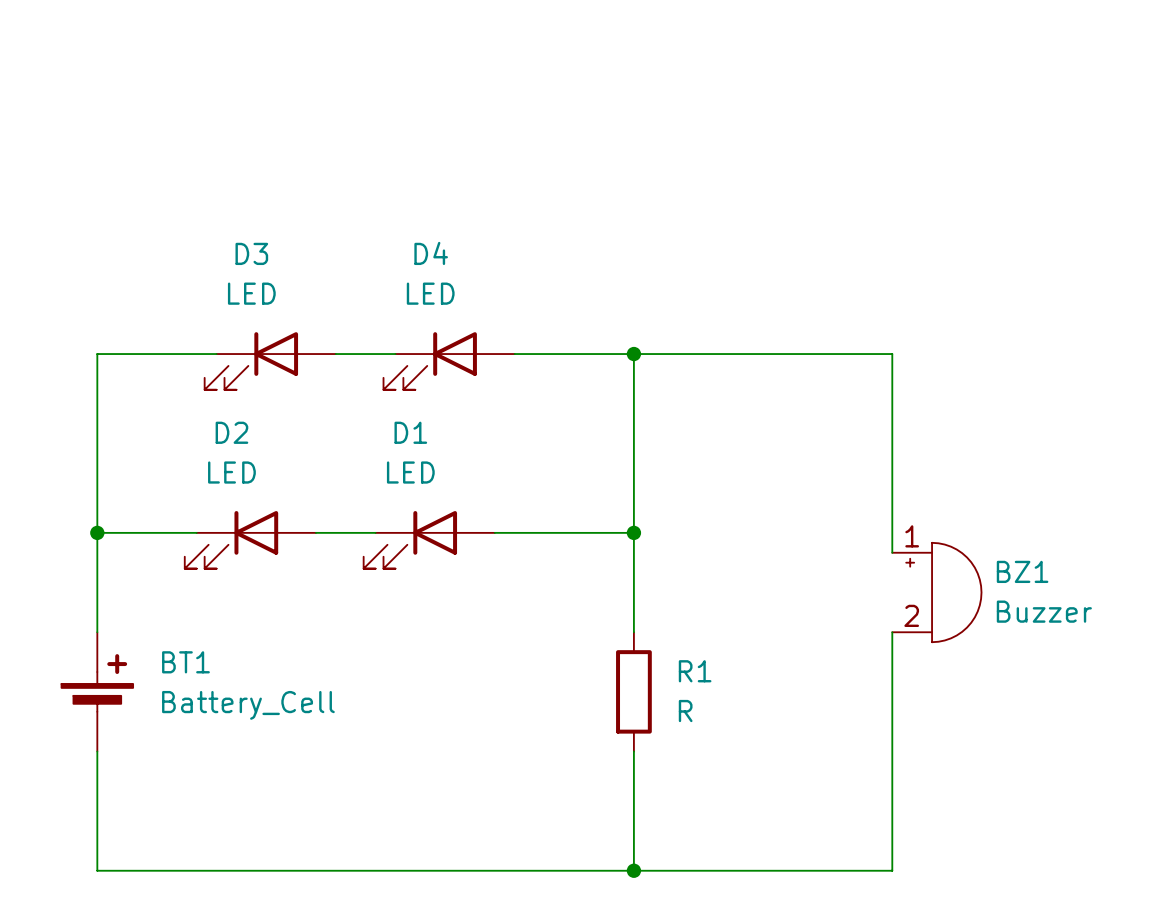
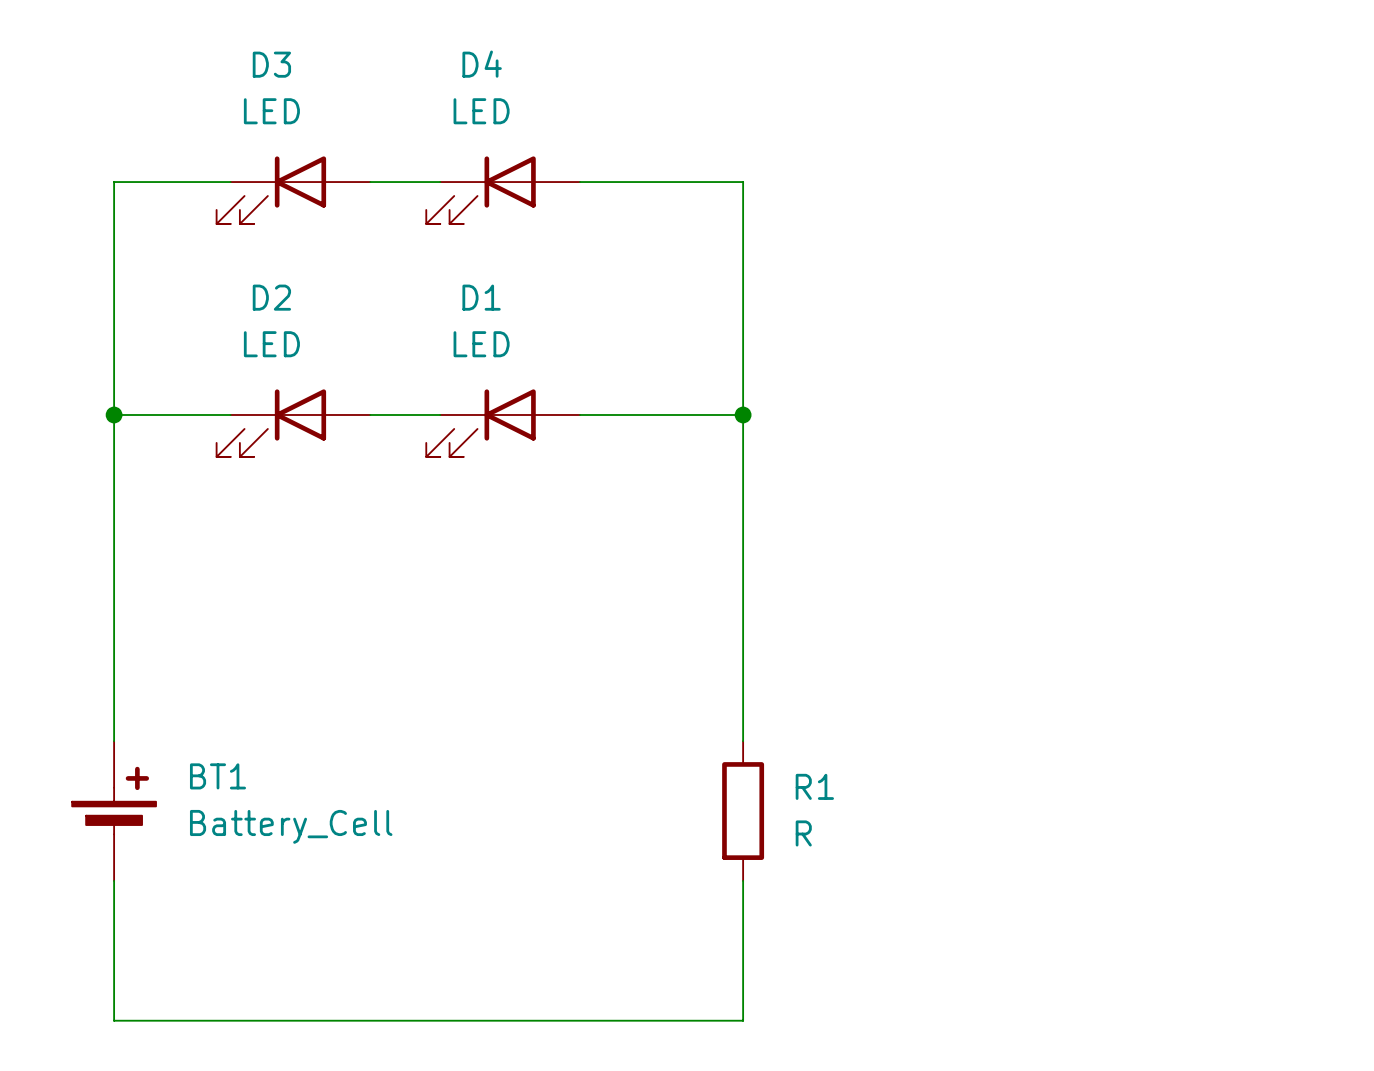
wire: none -> (230, 182) (114, 182) (114, 414)
junction: none -> (114, 414)
wire: (633, 354) (892, 354) (892, 552) -> (743, 414) (743, 182) (580, 182)
D3 position: (270, 360) -> (293, 190)
D4 position: (449, 360) -> (503, 190)
wire: (97, 532) (196, 532) -> none
junction: (97, 532) -> none
wire: (315, 532) (375, 532) -> (370, 182) (440, 182)
wire: (494, 532) (633, 532) -> none
junction: (633, 532) -> none
D2 position: (250, 539) -> (293, 423)
D1 position: (429, 539) -> (503, 423)
BZ1: Buzzer (936, 592) -> none
wire: (892, 632) (892, 870) (633, 870) -> none
junction: (633, 870) -> none

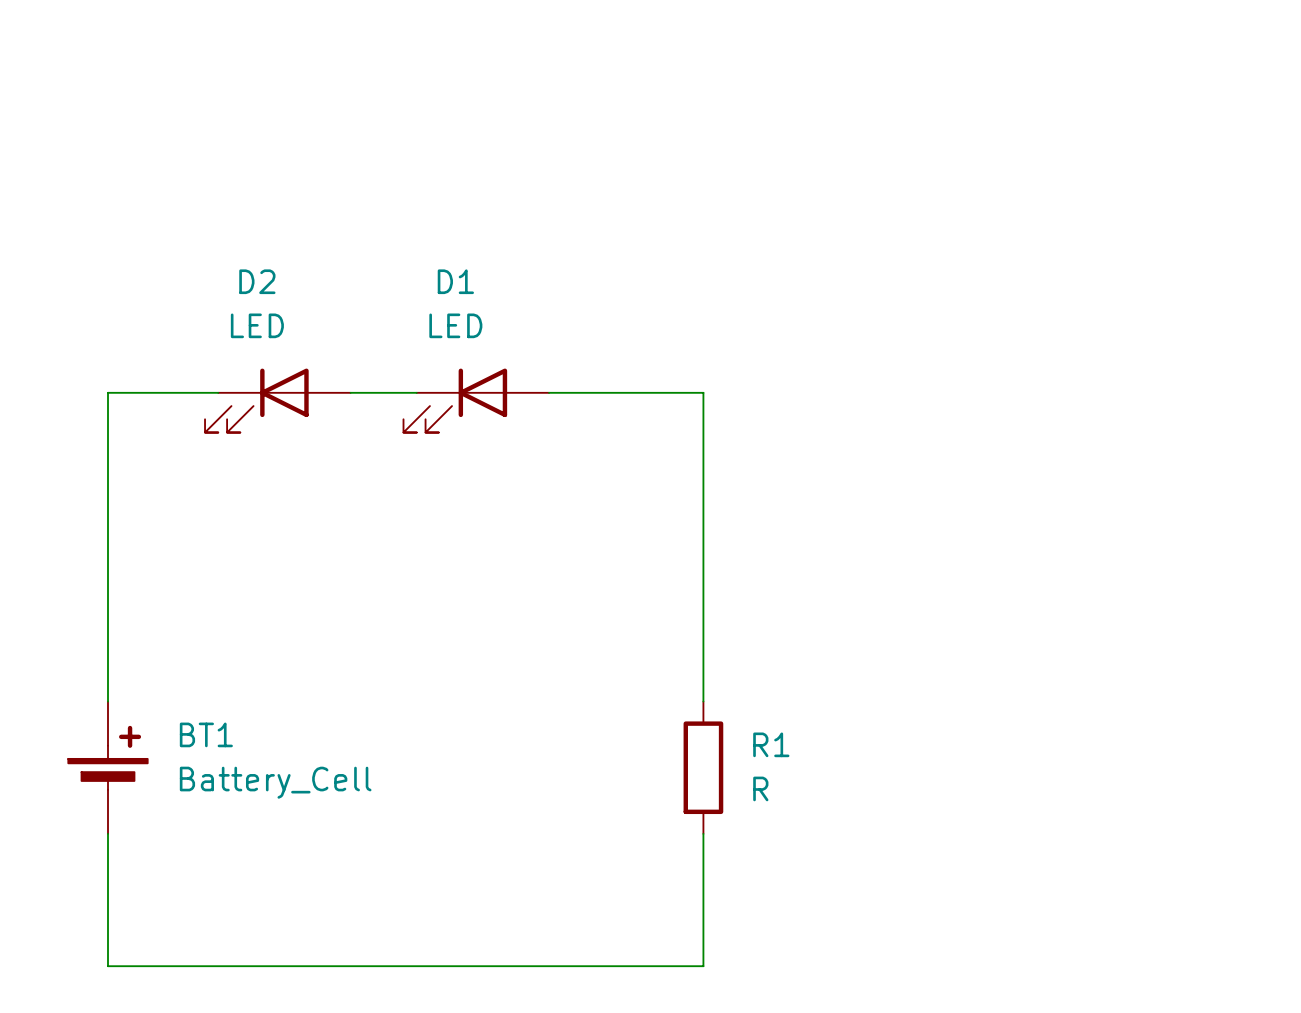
wire: (230, 182) (114, 182) (114, 414) -> none
wire: (370, 182) (440, 182) -> none
wire: (580, 182) (743, 182) (743, 414) -> none
D3: LED (293, 190) -> none
D4: LED (503, 190) -> none
junction: (114, 414) -> none
junction: (743, 414) -> none

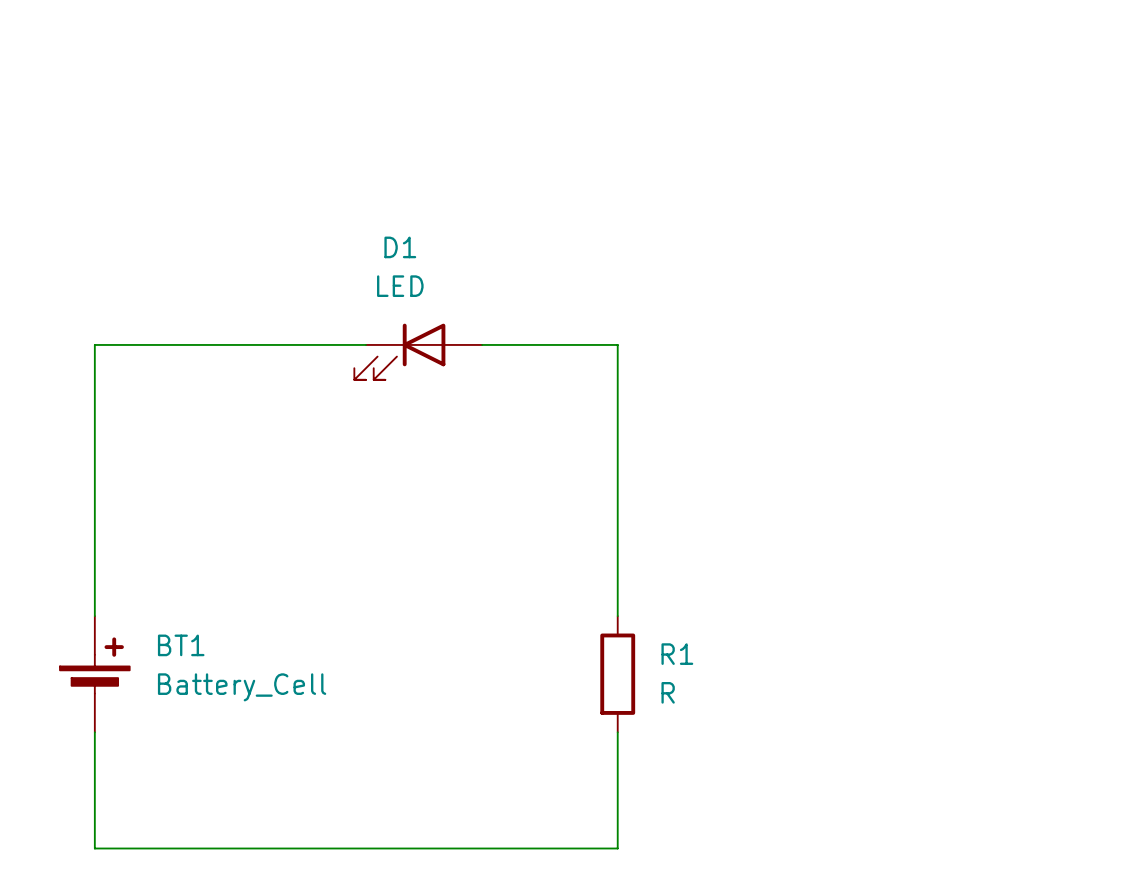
D2: LED (277, 400) -> none

